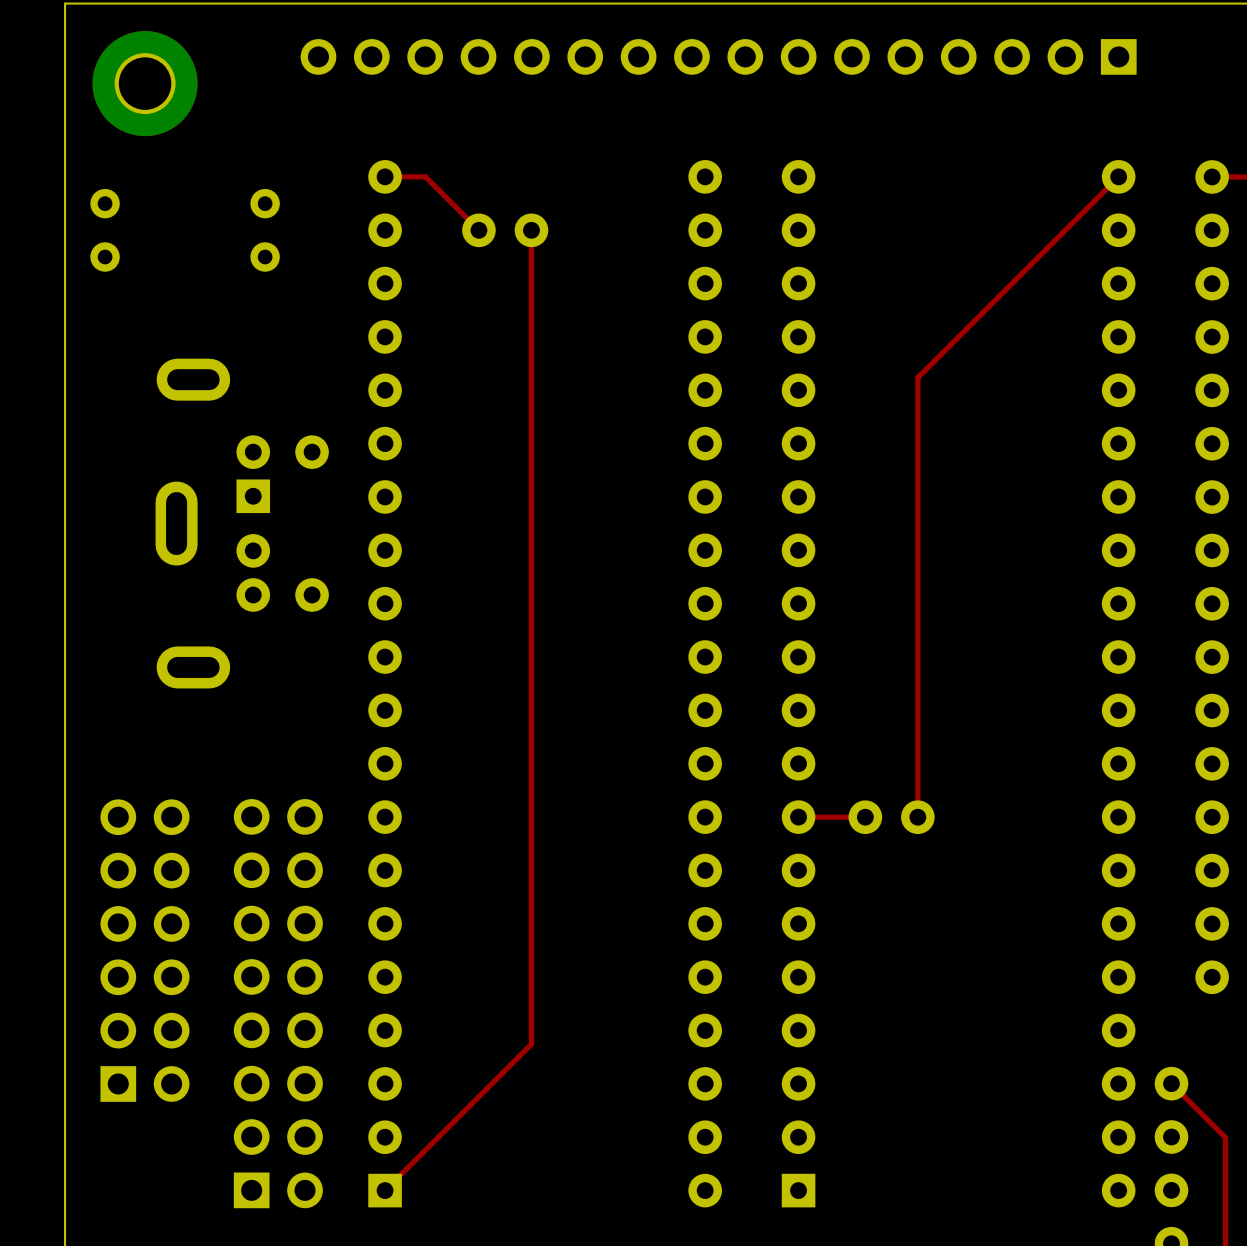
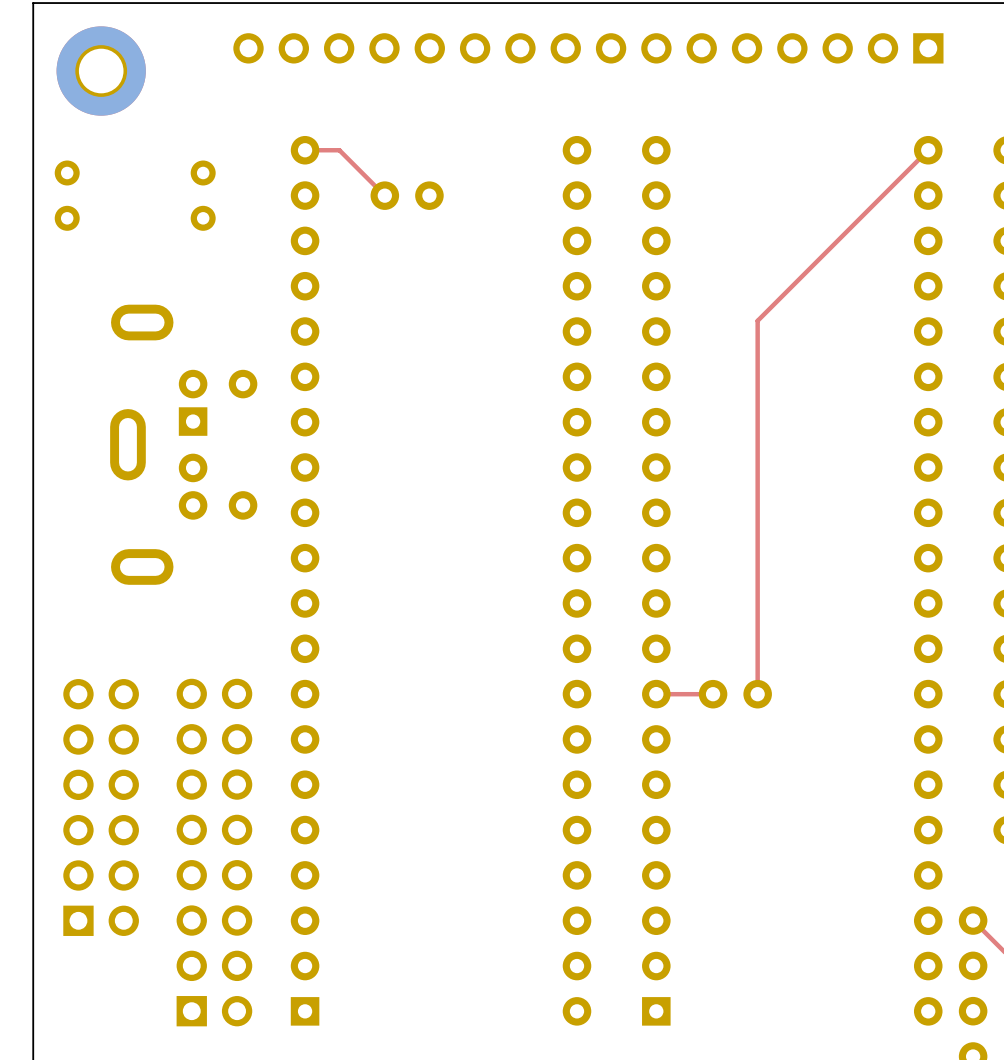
top track: (531, 230) (531, 1044) (385, 1190) -> none

